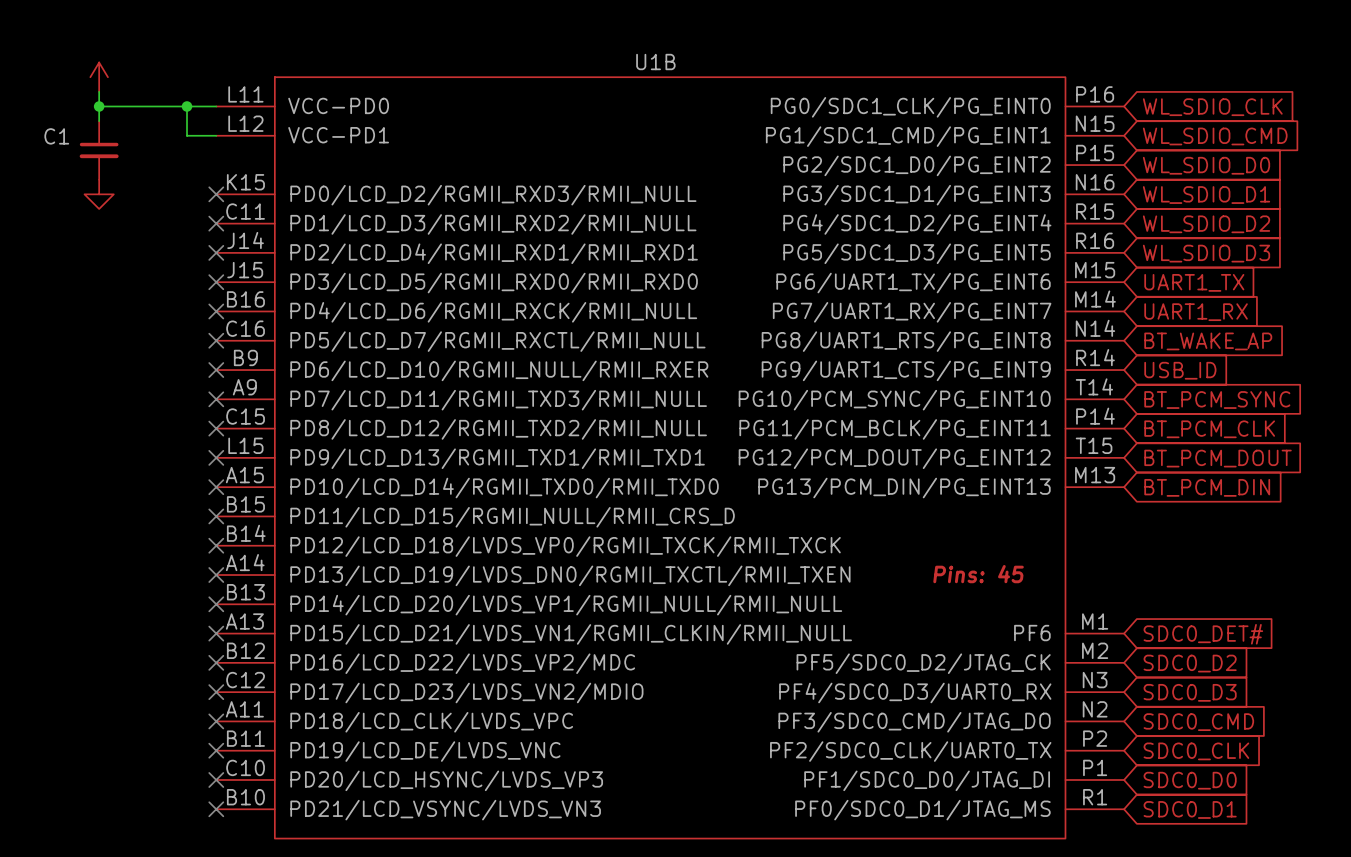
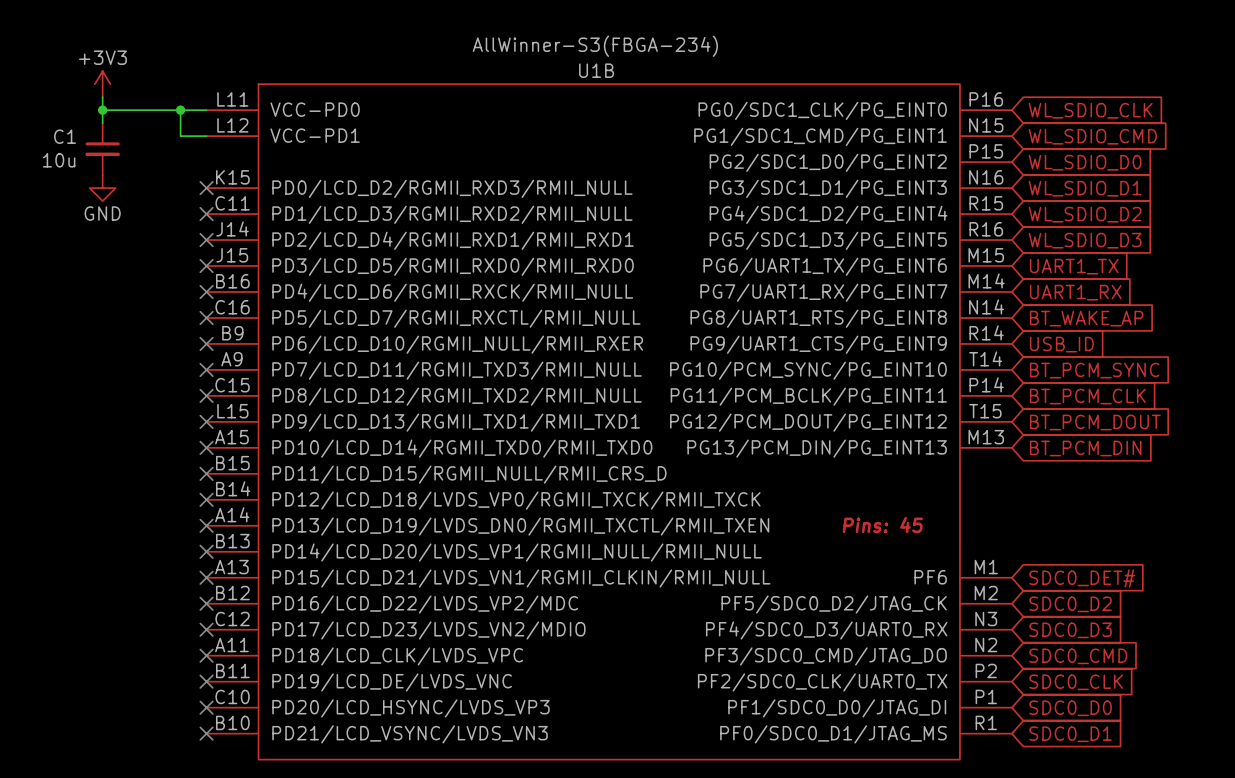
U1B value: none -> AllWinner-S3(FBGA-234) (595, 46)
power symbol text: none -> +3V3 (102, 57)
C1 value: none -> 10u (59, 160)
power symbol text: none -> GND (102, 213)

